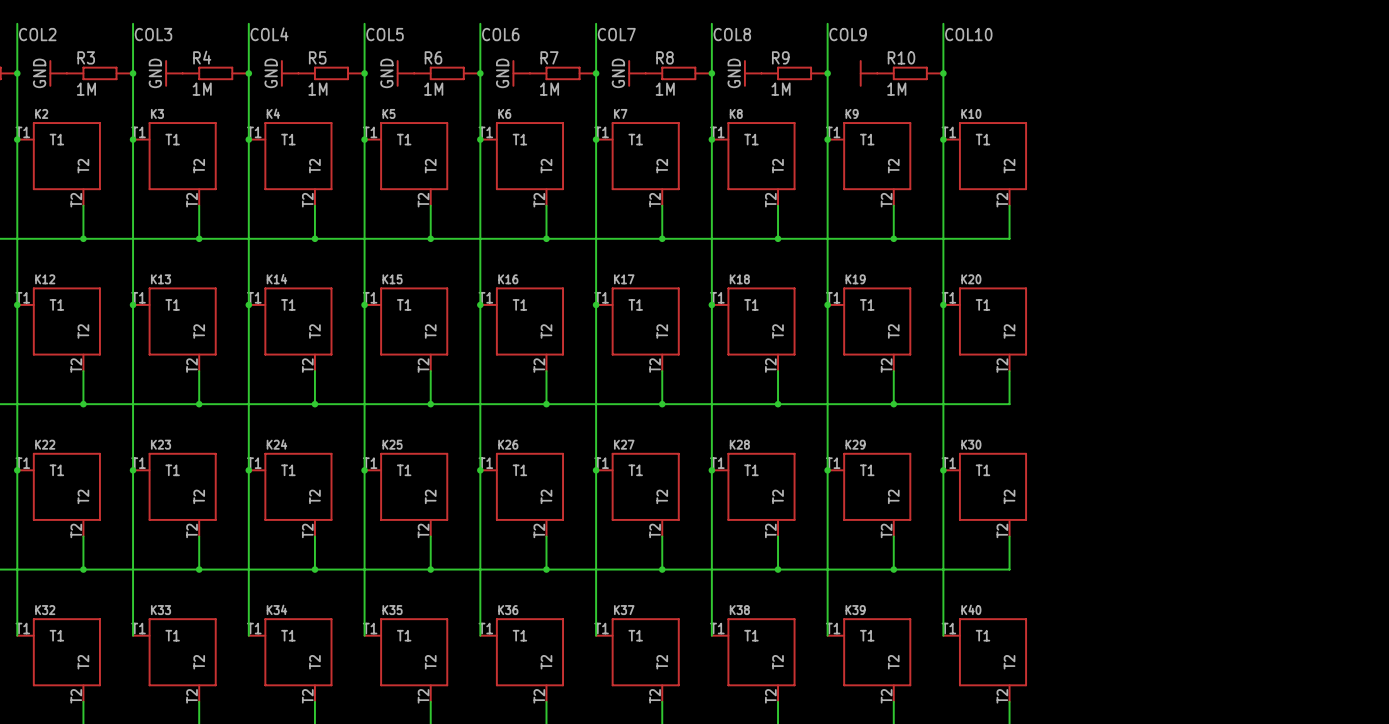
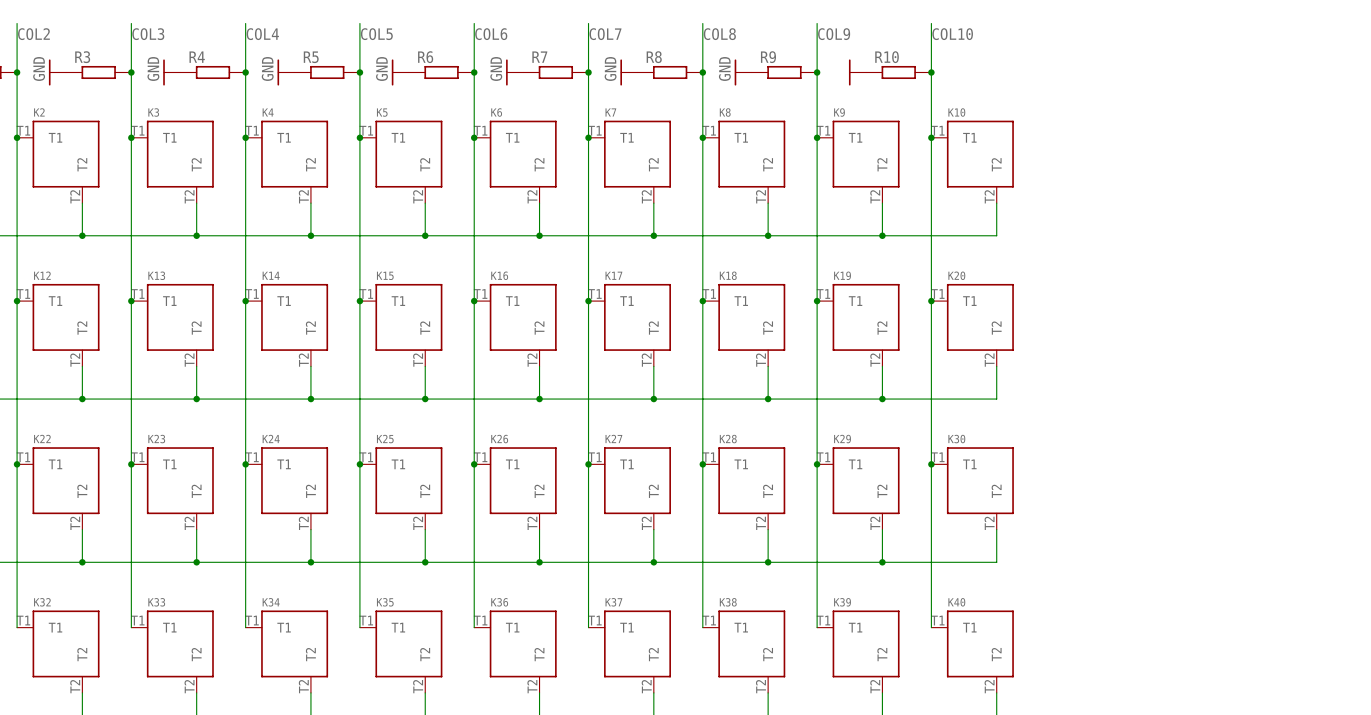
R3 value: 1M (86, 89) -> none
R4 value: 1M (202, 89) -> none
R5 value: 1M (317, 89) -> none
R6 value: 1M (433, 89) -> none
R7 value: 1M (549, 89) -> none
R8 value: 1M (665, 89) -> none
R9 value: 1M (781, 89) -> none
R10 value: 1M (896, 89) -> none

